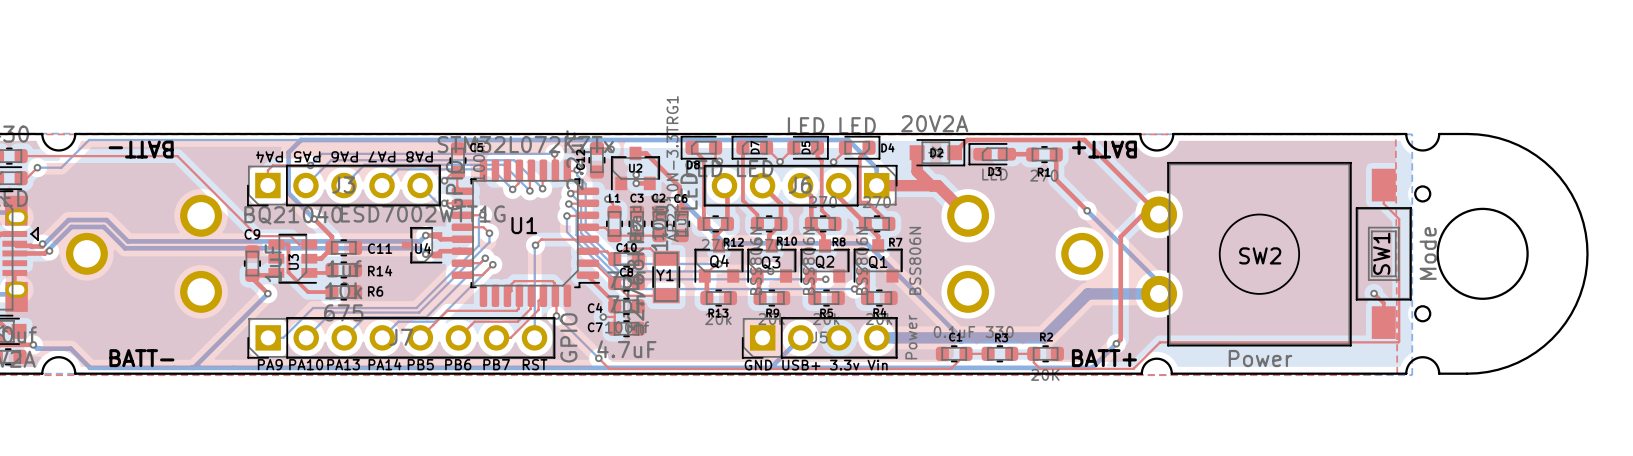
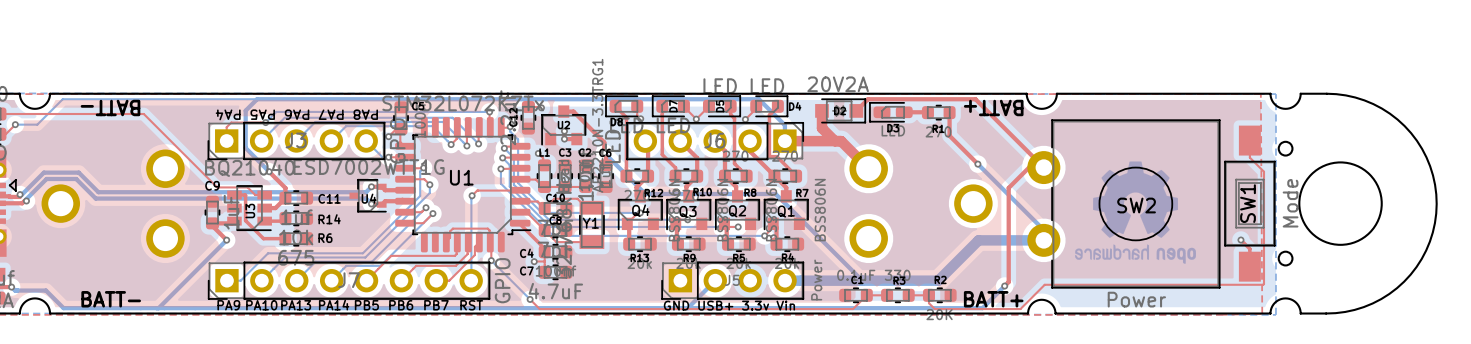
drawing: none -> [1075, 161, 1196, 264]

